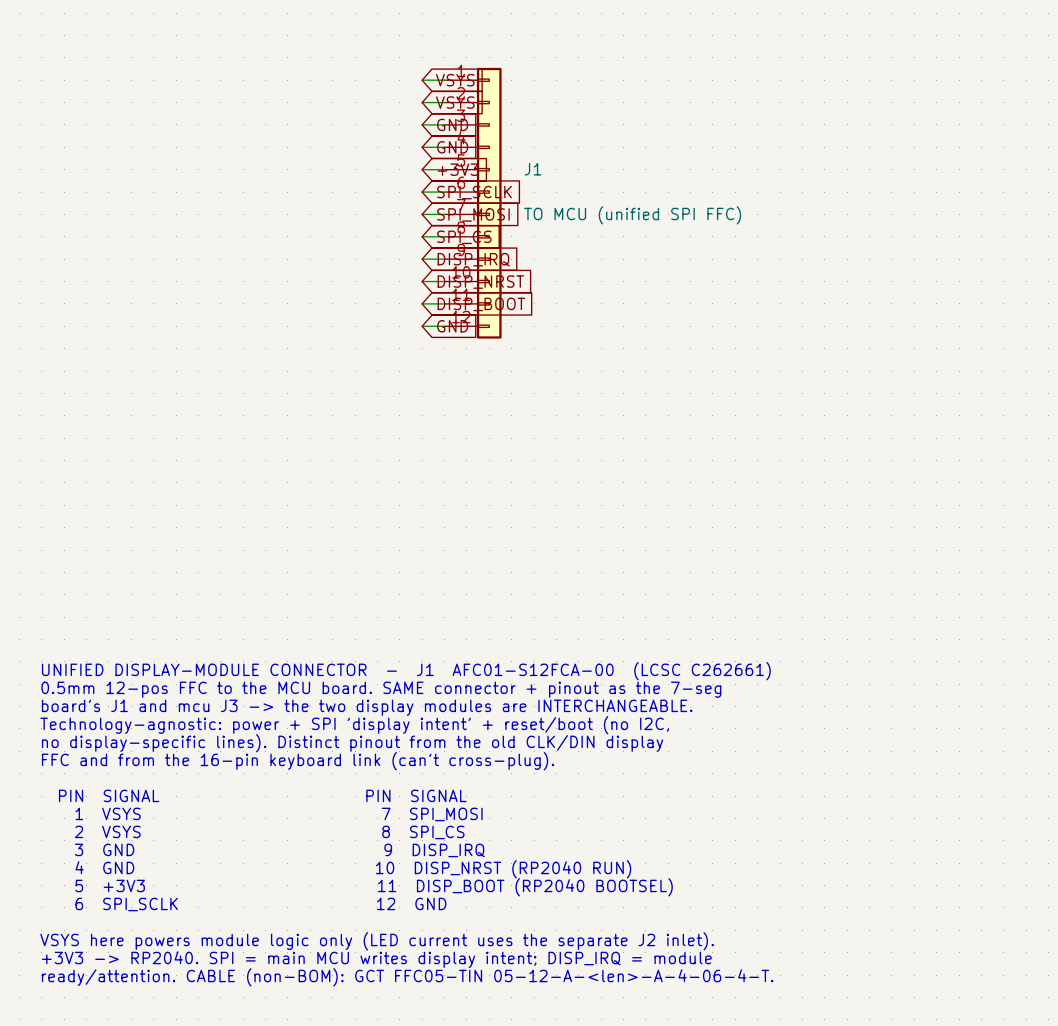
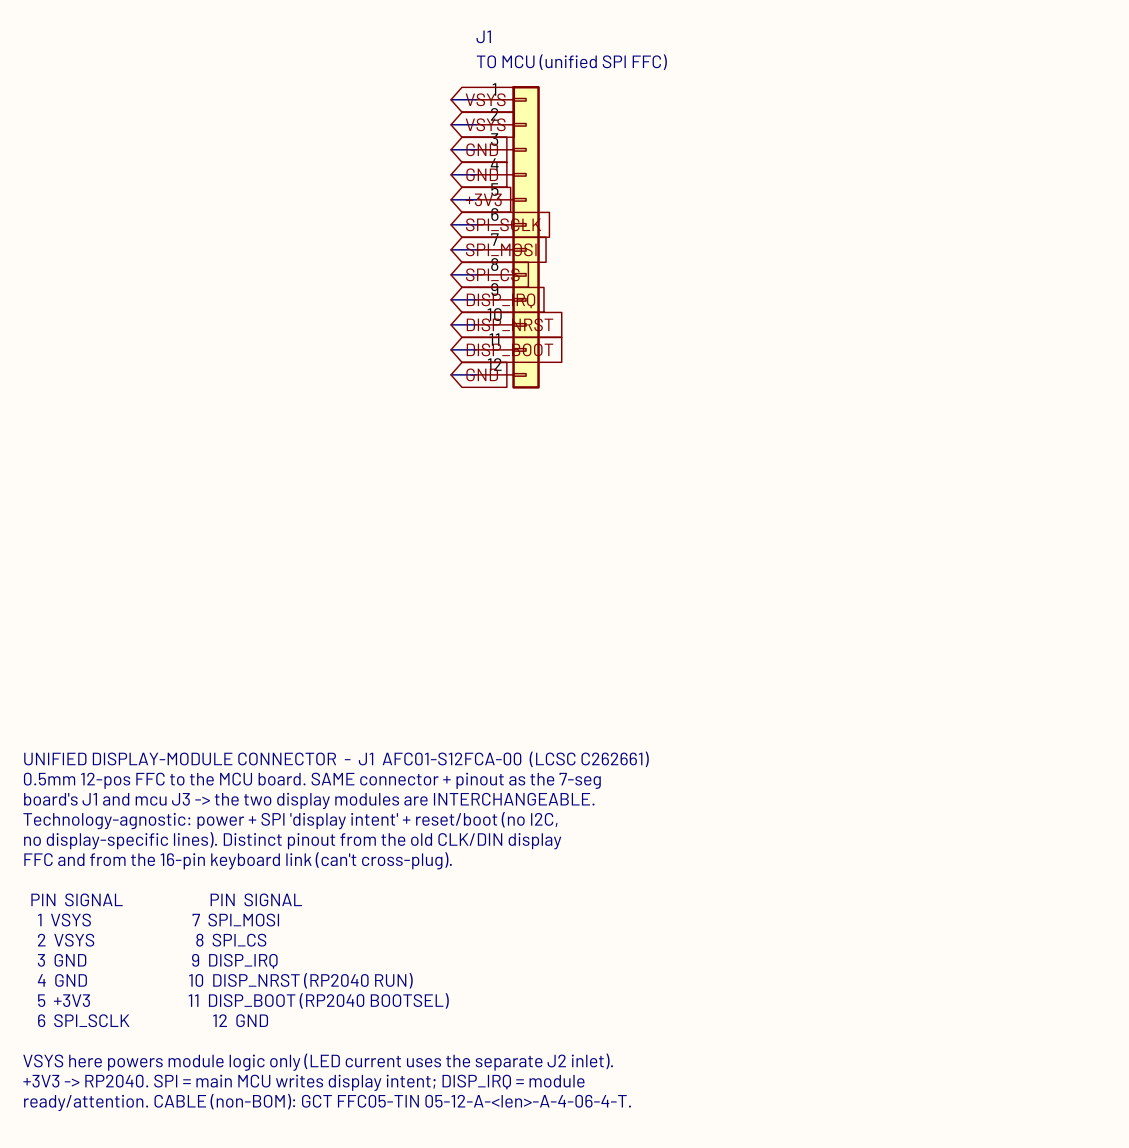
J1 name position: J1 (533, 169) -> J1 (483, 36)
J1 value position: TO MCU (unified SPI FFC) (632, 215) -> TO MCU (unified SPI FFC) (571, 62)

